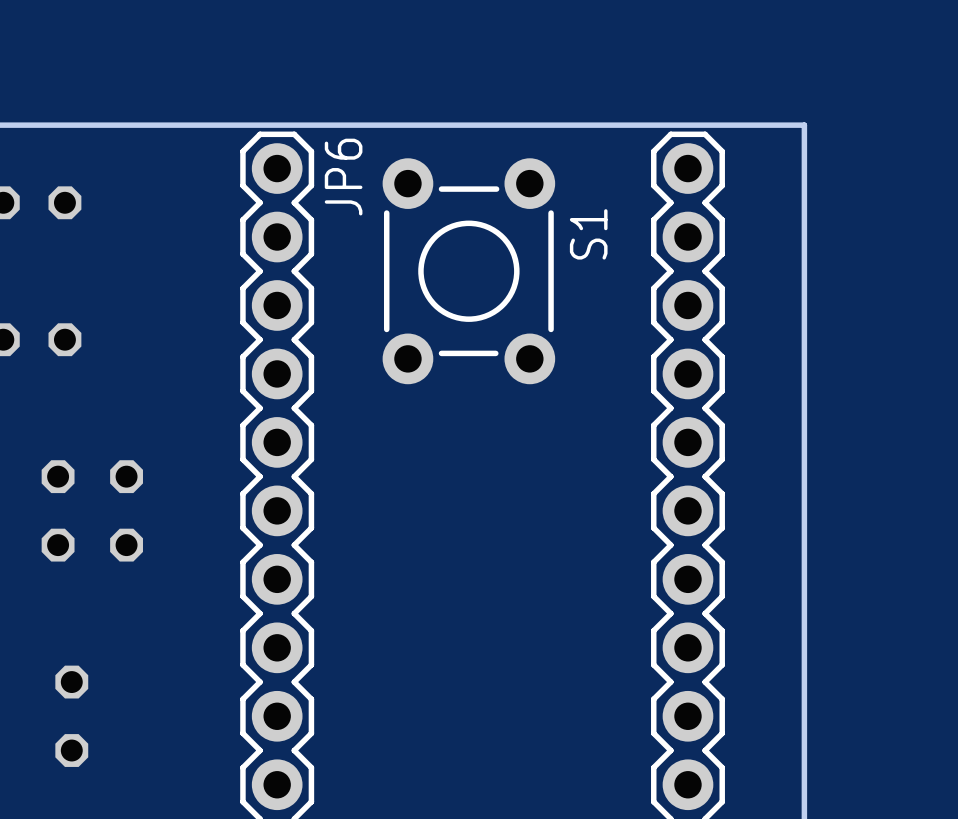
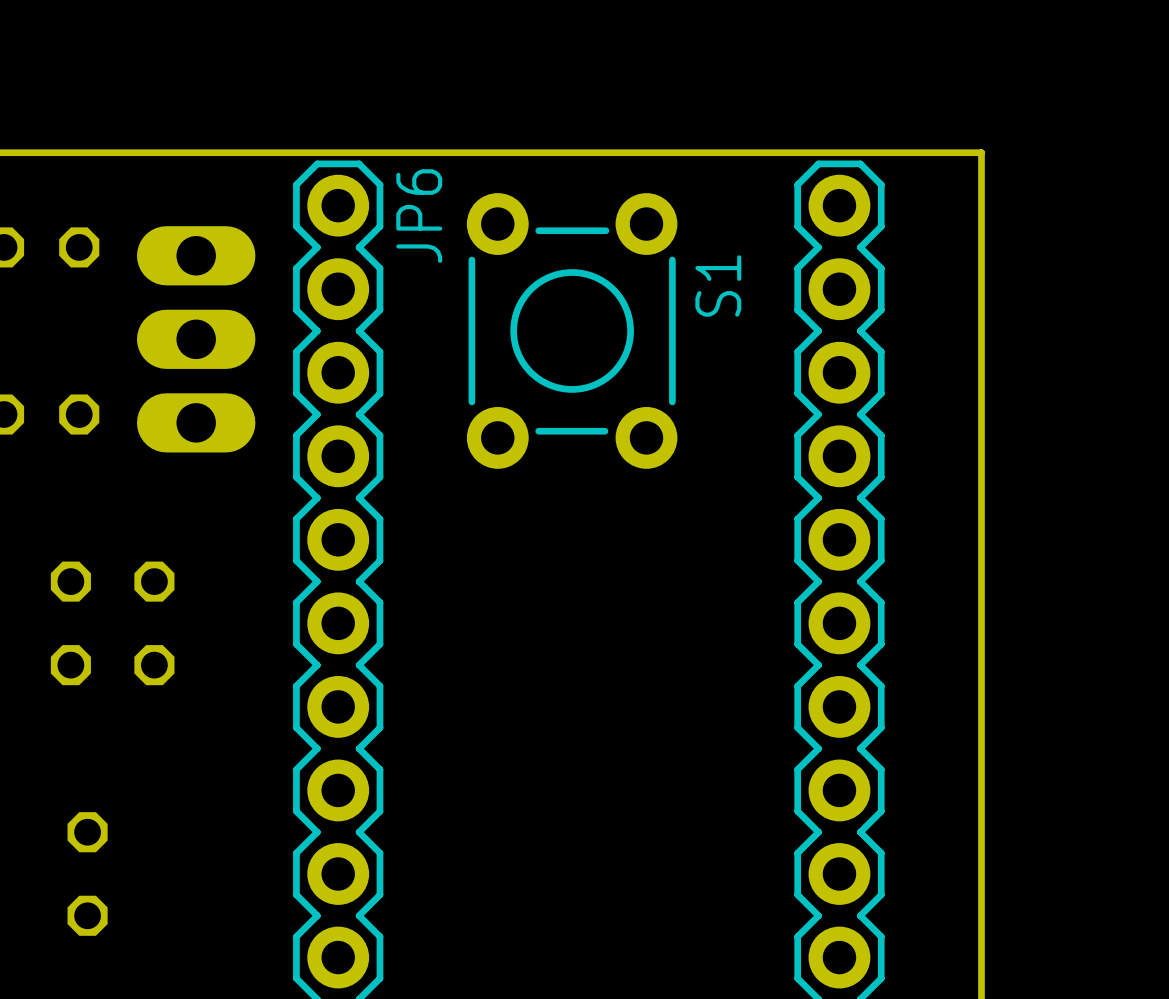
part: none -> (196, 339)

